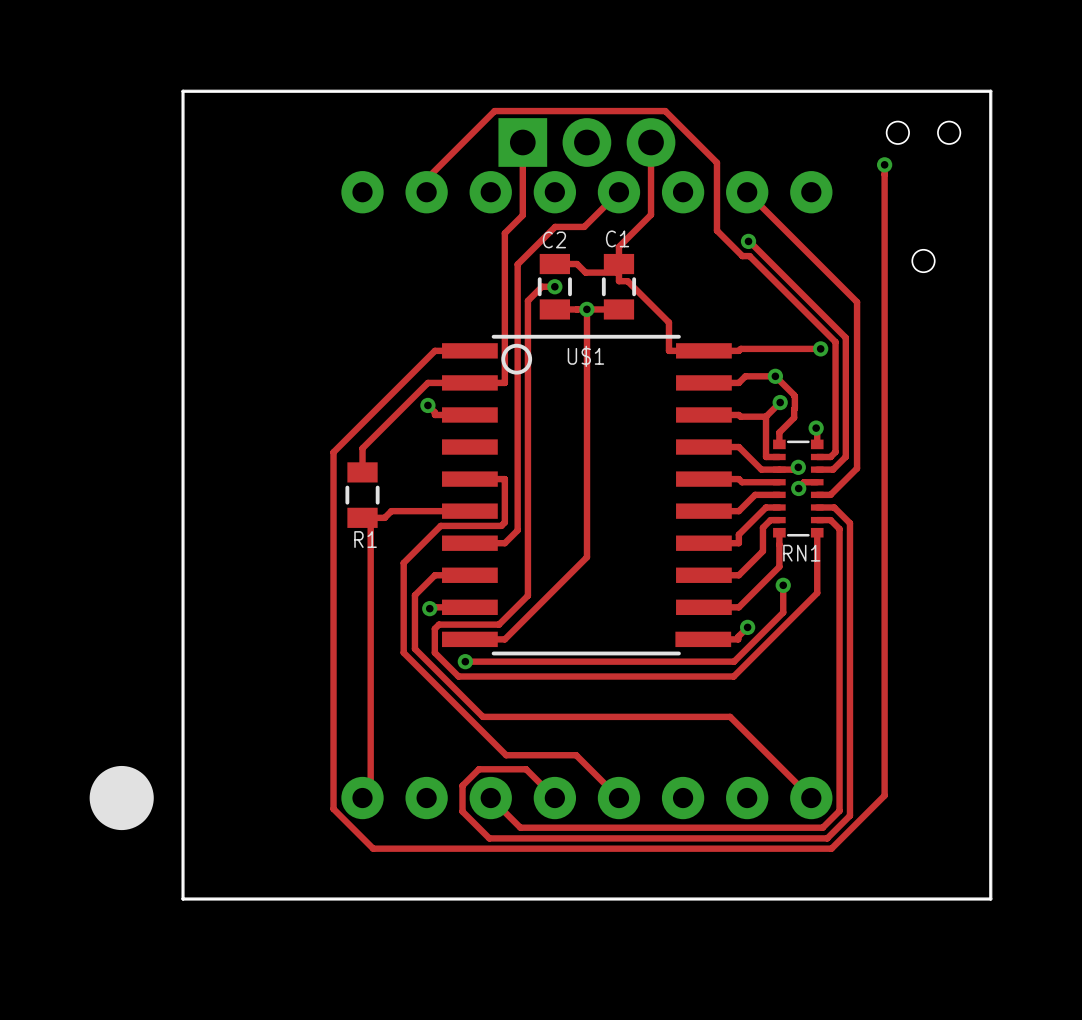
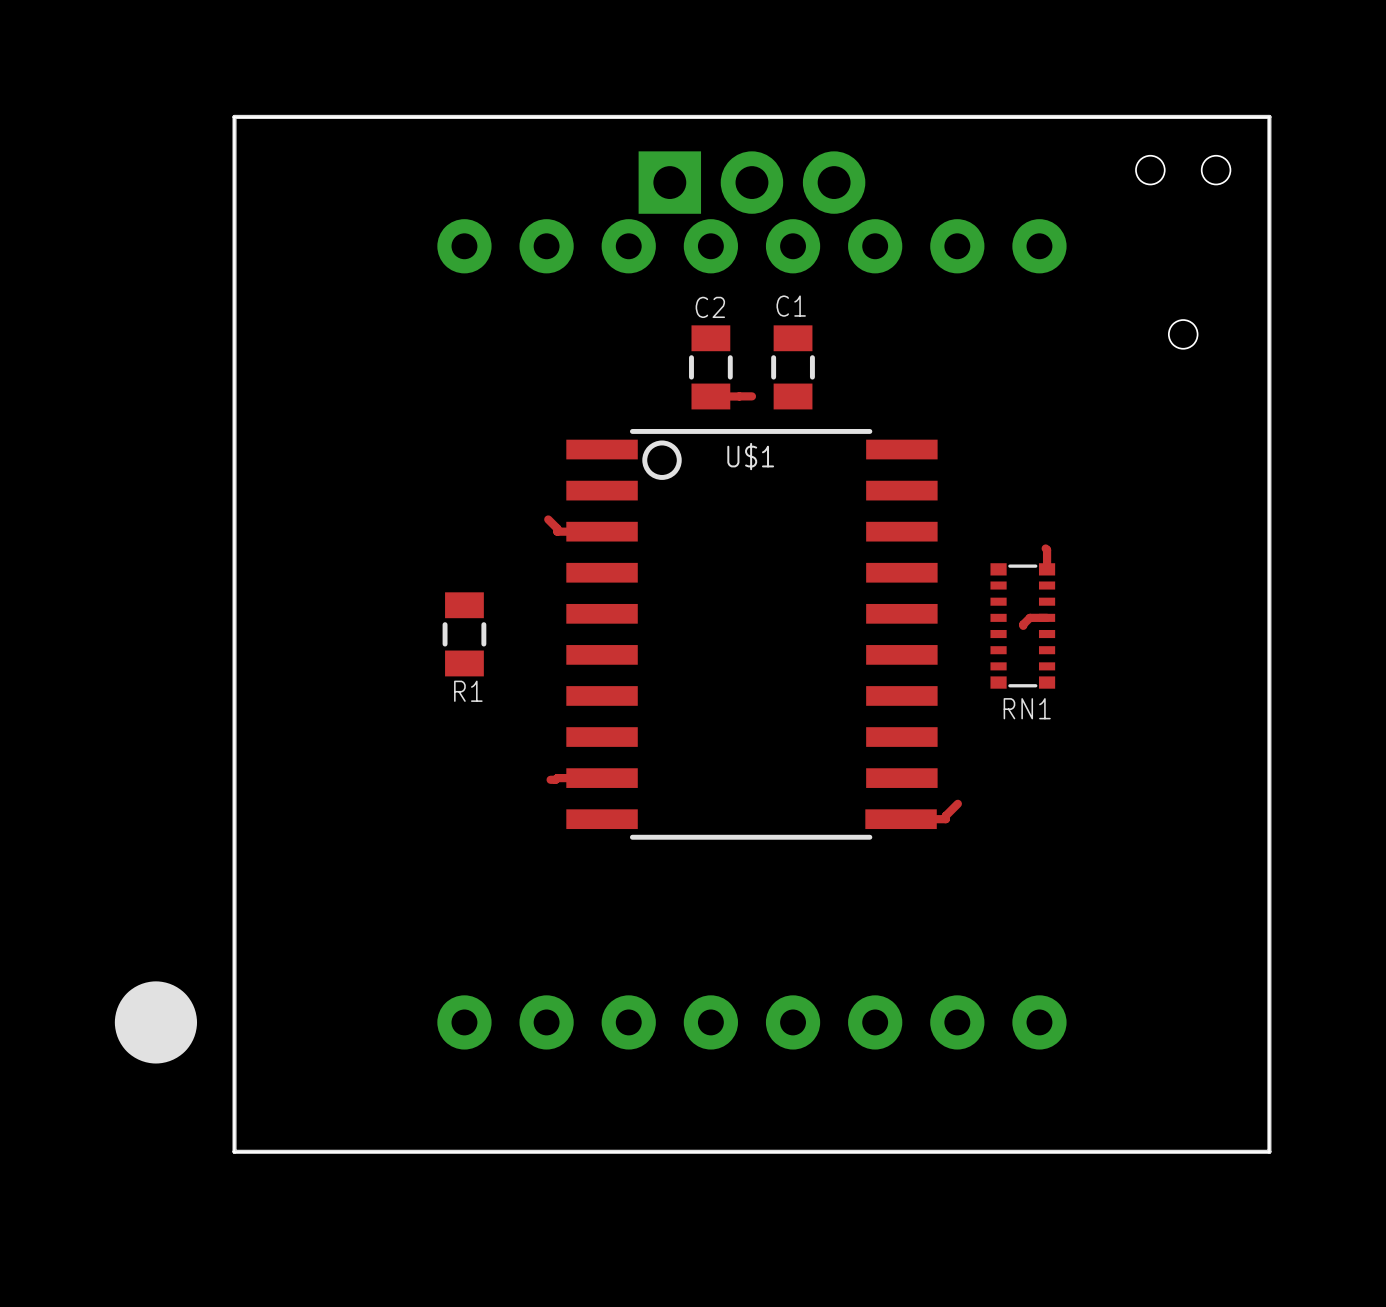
track: (522, 142) (522, 215) (504, 233) (504, 382) (427, 382) (362, 448) (362, 472) -> none
track: (651, 142) (651, 214) (618, 246) (618, 281) (627, 281) (668, 322) (668, 350) (820, 348) -> none
track: (884, 164) (884, 795) (831, 848) (373, 848) (333, 808) (333, 452) (434, 350) (469, 350) -> none
via: (884, 164) -> none
track: (426, 192) (426, 179) (494, 111) (665, 111) (716, 162) (716, 230) (742, 256) (749, 256) (835, 342) (835, 452) (830, 457) (817, 457) -> none
track: (618, 192) (584, 226) (555, 226) (517, 264) (517, 530) (504, 543) (469, 543) -> none
track: (747, 192) (857, 302) (857, 468) (830, 494) (817, 494) -> none
track: (748, 241) (845, 337) (845, 456) (833, 469) (817, 469) -> none
via: (748, 241) -> none
track: (554, 264) (577, 264) (585, 272) (618, 272) -> none
track: (554, 286) (542, 286) (527, 300) (527, 595) (499, 624) (439, 624) (434, 628) (434, 652) (458, 676) (733, 676) (817, 593) (817, 532) -> none
via: (554, 286) -> none
via: (586, 309) -> none
track: (618, 309) (587, 309) (587, 557) (504, 639) (469, 639) -> none
via: (820, 348) -> none
via: (775, 376) -> none
track: (703, 382) (738, 382) (745, 376) (775, 376) (794, 396) (794, 417) (779, 432) (779, 444) -> none
track: (780, 402) (766, 416) -> none
via: (780, 402) -> none
via: (427, 405) -> none
track: (703, 414) (766, 416) -> none
track: (766, 416) (766, 457) (779, 457) -> none
via: (816, 428) -> none
track: (703, 447) (738, 447) (761, 469) (792, 469) (798, 467) -> none
via: (798, 467) -> none
track: (469, 479) (504, 479) (504, 522) (501, 525) (440, 525) (403, 562) (403, 652) (506, 755) (576, 755) (618, 798) -> none
track: (703, 479) (738, 479) (742, 482) (779, 482) -> none
via: (798, 488) -> none
track: (779, 494) (755, 494) (738, 511) (703, 511) -> none
track: (779, 507) (766, 507) (738, 534) (738, 543) (703, 543) -> none
track: (817, 507) (834, 507) (849, 523) (849, 815) (827, 838) (489, 838) (462, 811) (462, 785) (478, 769) (526, 769) (554, 798) -> none
track: (469, 511) (391, 511) (384, 517) (362, 517) -> none
track: (370, 517) (370, 789) (362, 798) -> none
track: (779, 520) (770, 520) (762, 527) (762, 551) (738, 575) (703, 575) -> none
track: (817, 520) (830, 520) (839, 529) (839, 810) (822, 827) (520, 827) (490, 798) -> none
track: (779, 532) (779, 566) (738, 607) (703, 607) -> none
track: (469, 575) (434, 575) (414, 595) (414, 648) (482, 716) (730, 716) (811, 798) -> none
track: (783, 585) (783, 612) (734, 661) (465, 661) -> none
via: (783, 585) -> none
via: (429, 608) -> none
via: (747, 627) -> none
via: (465, 661) -> none

